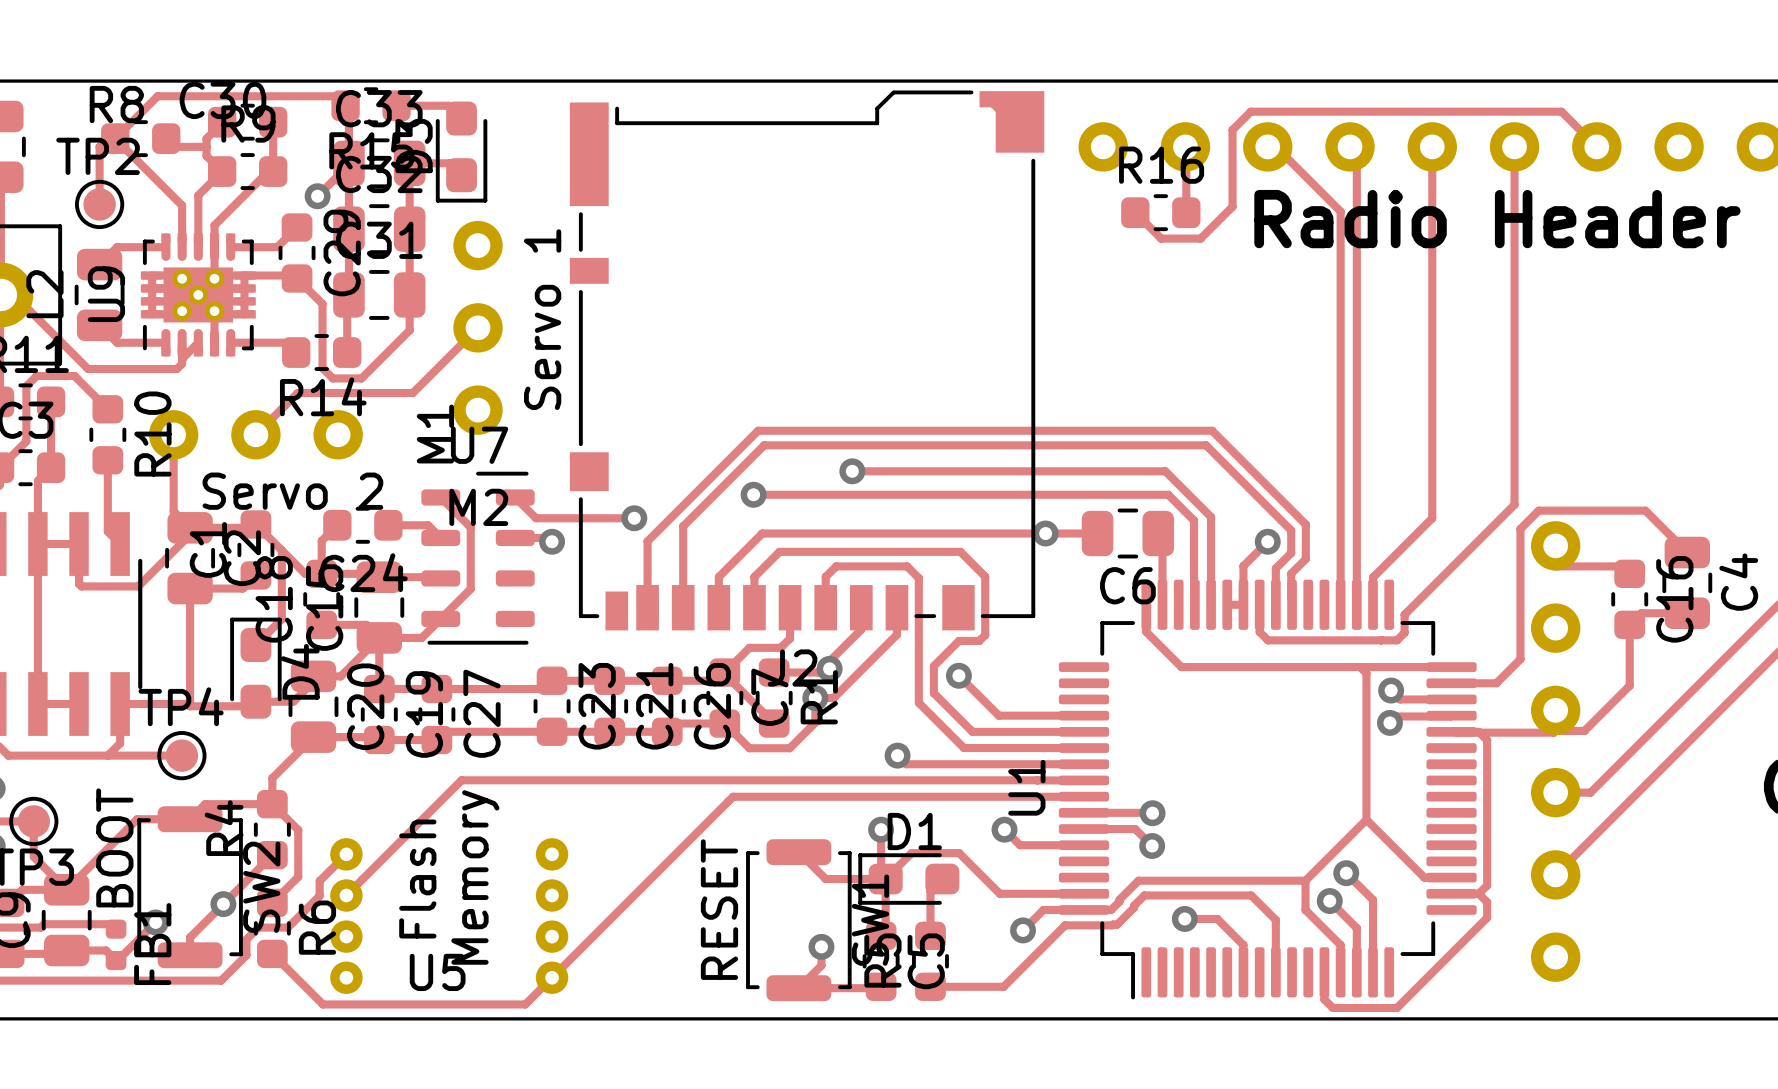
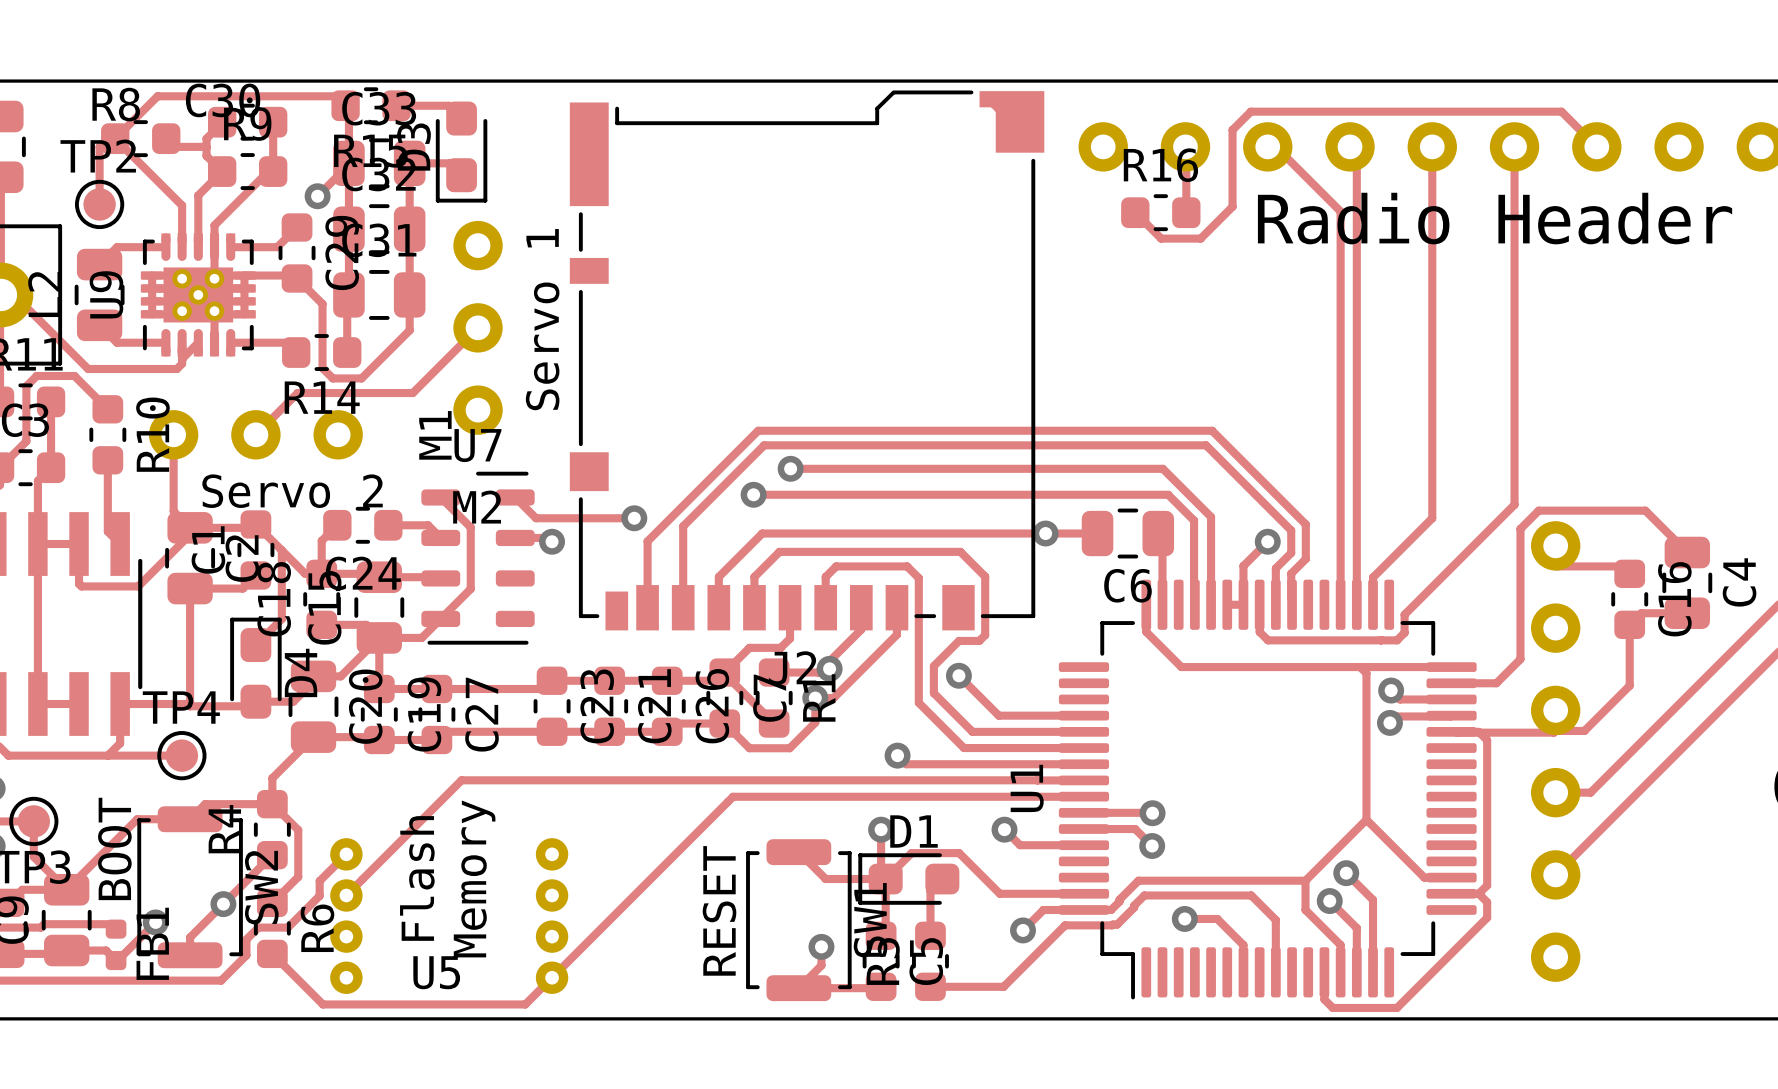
track: (852, 471) (1165, 471) -> (790, 468) (1162, 468) (1165, 471)
via position: (852, 471) -> (790, 468)

